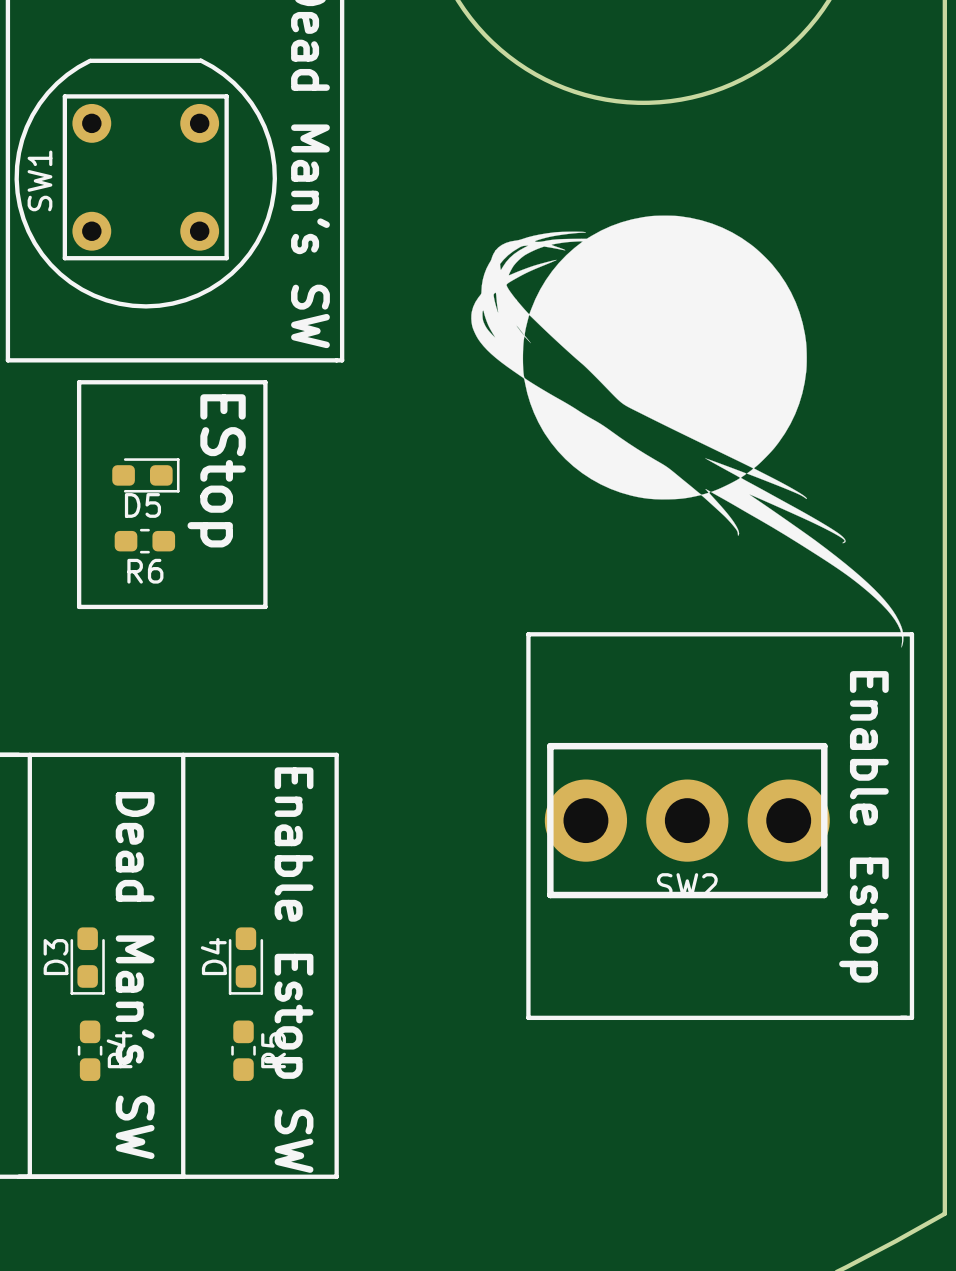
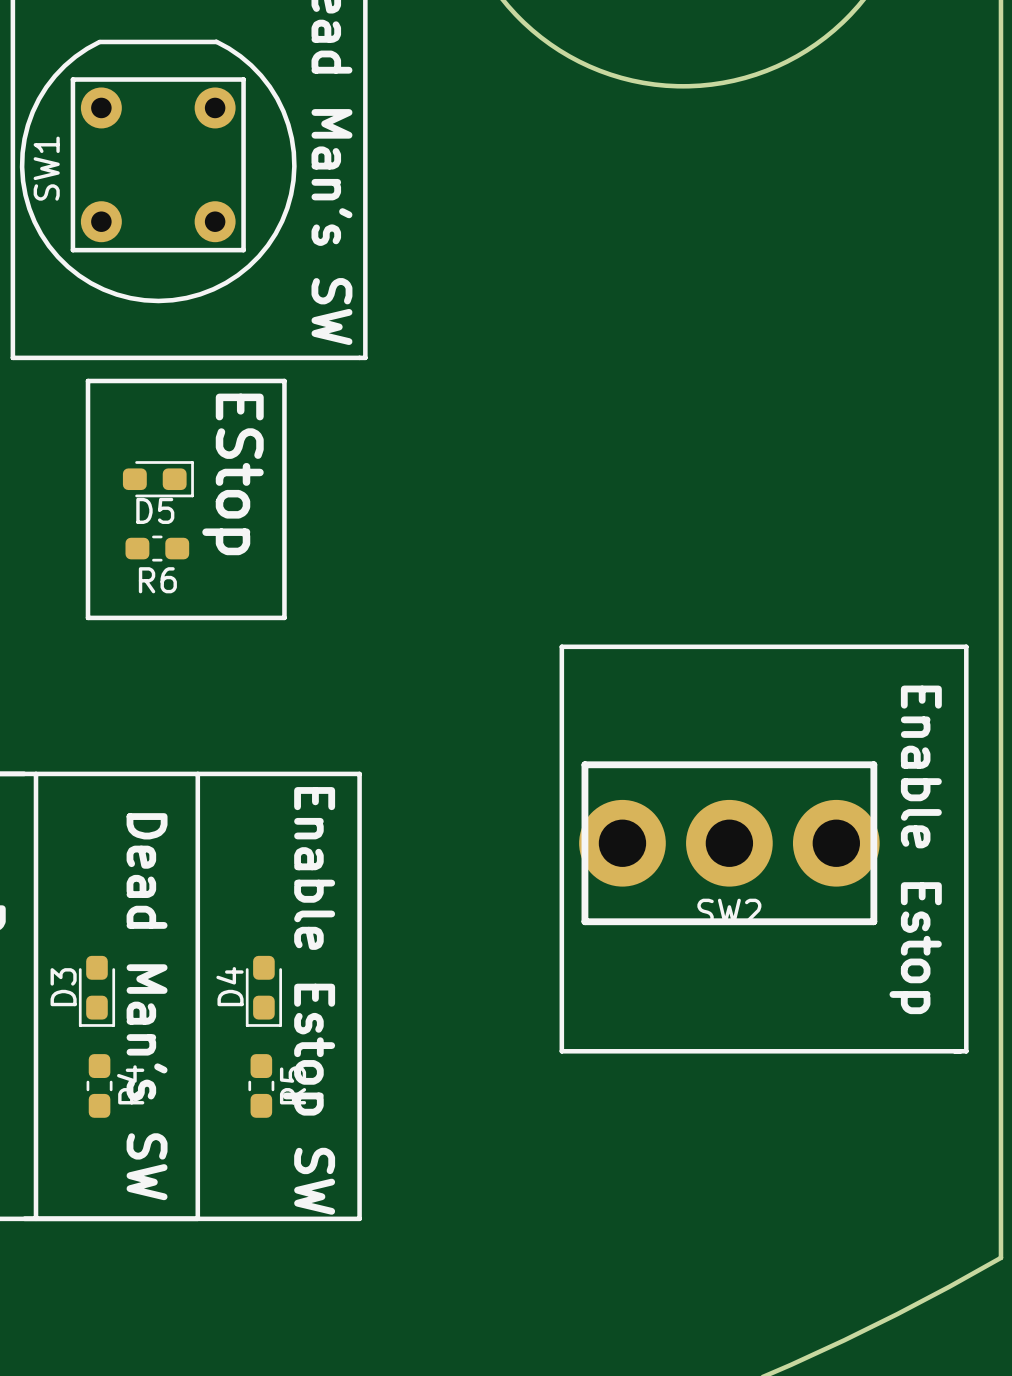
drawing: [471, 215, 904, 648] -> none

